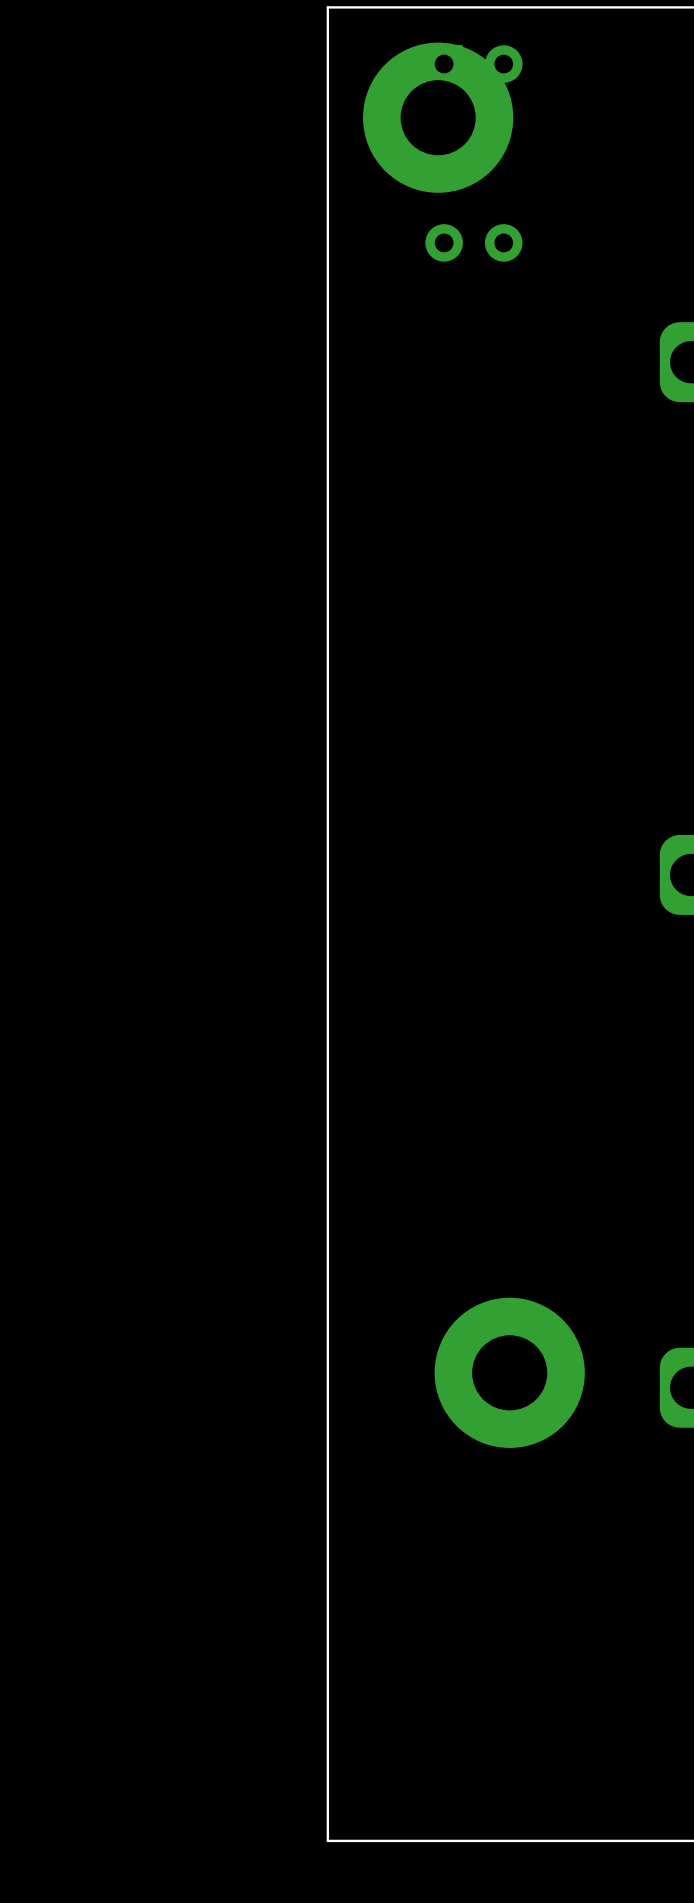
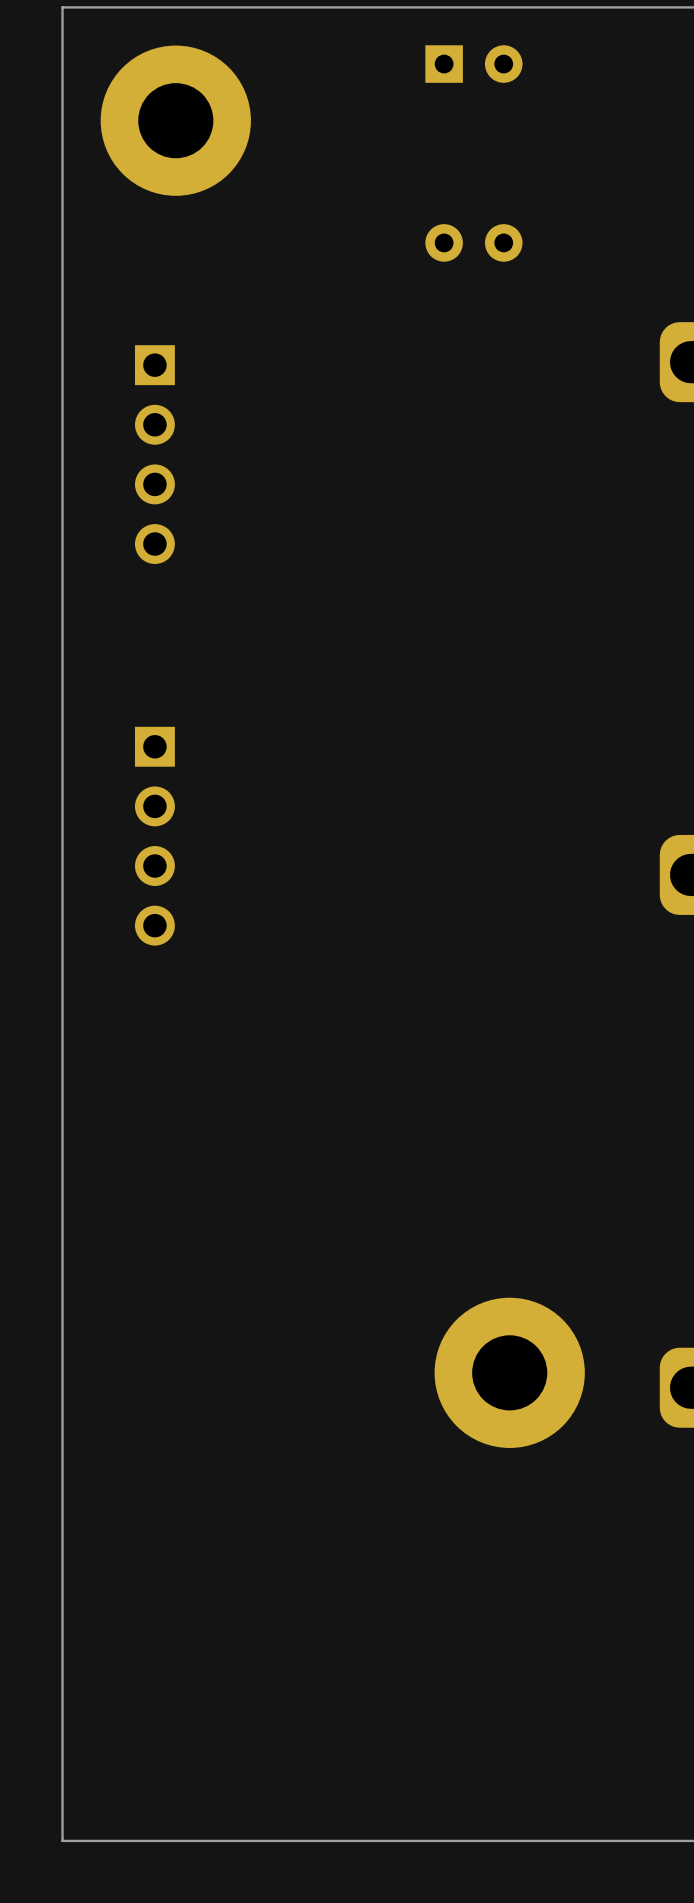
board edge: (327, 7) (327, 1840) -> (327, 7) (62, 7) (62, 1840) (327, 1840)
part position: (438, 117) -> (175, 120)
part: none -> (154, 454)
part: none -> (154, 836)

